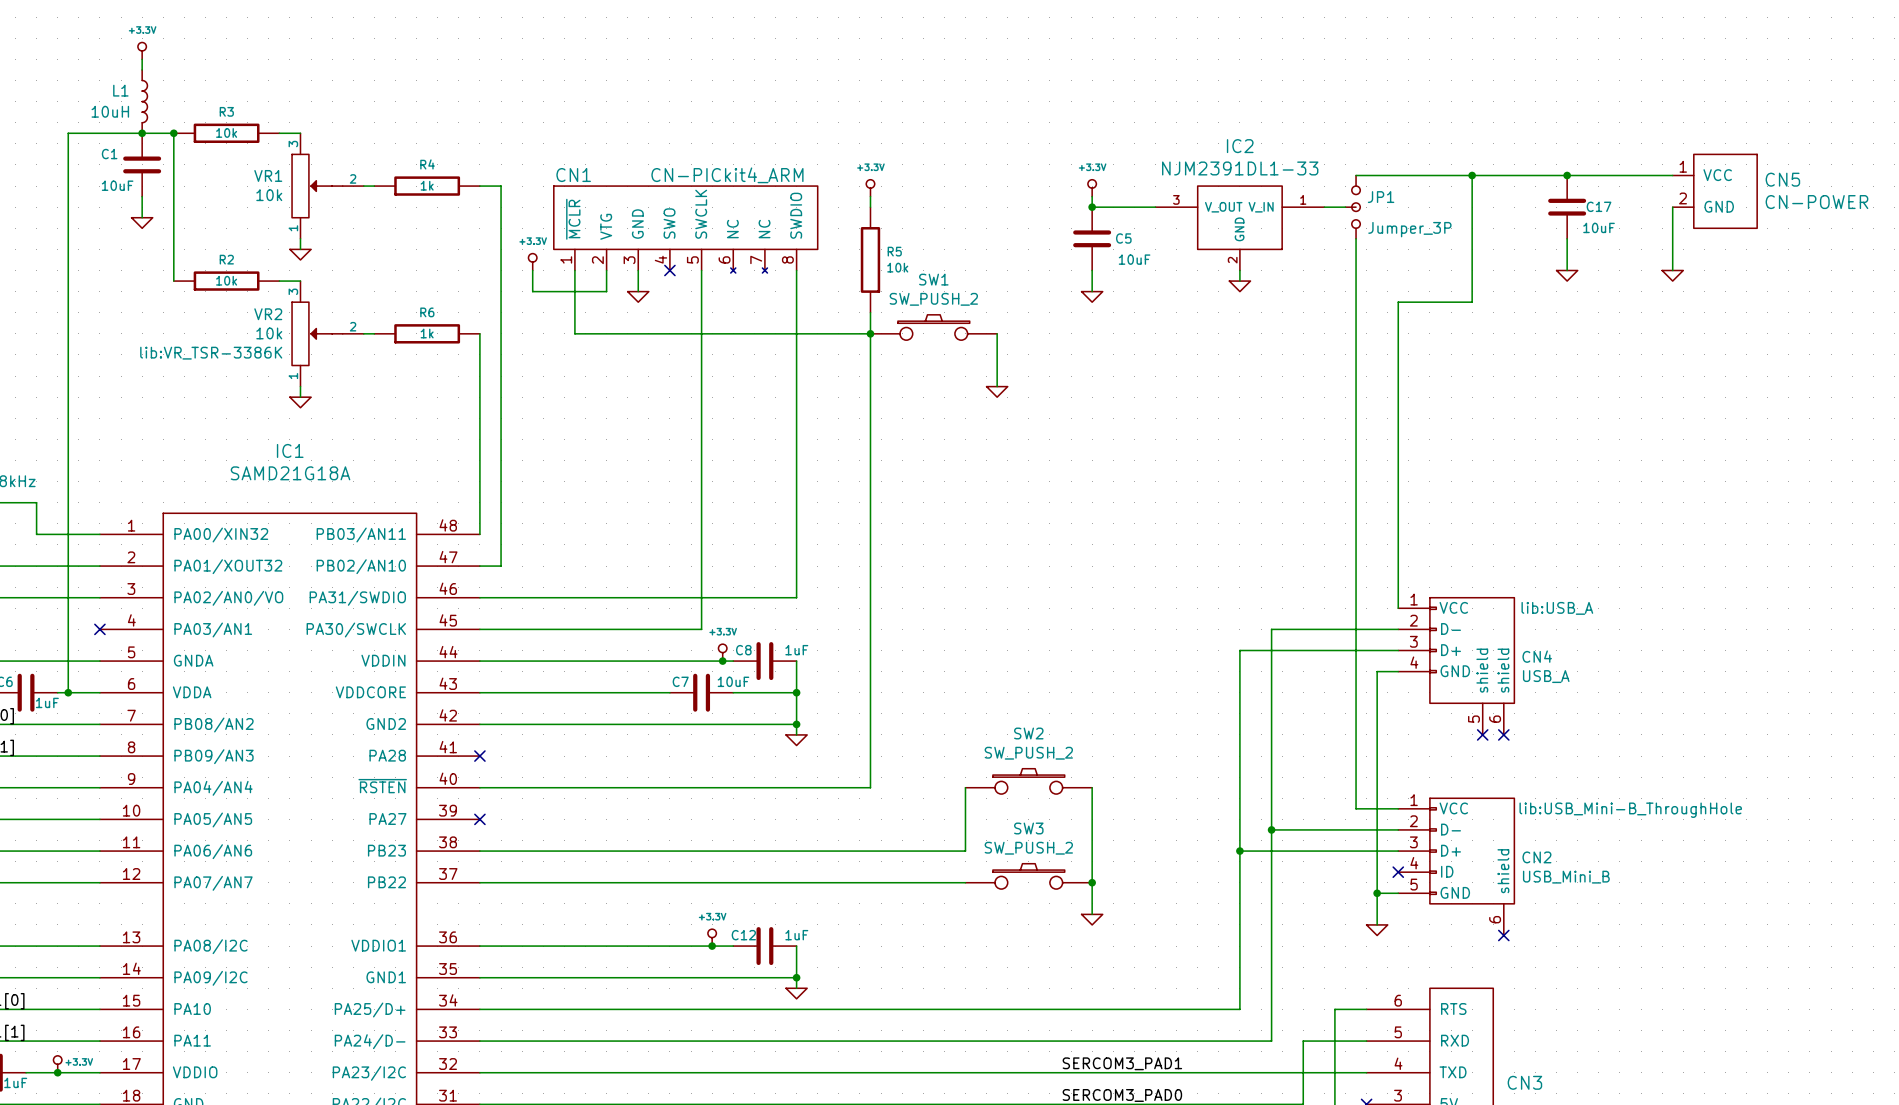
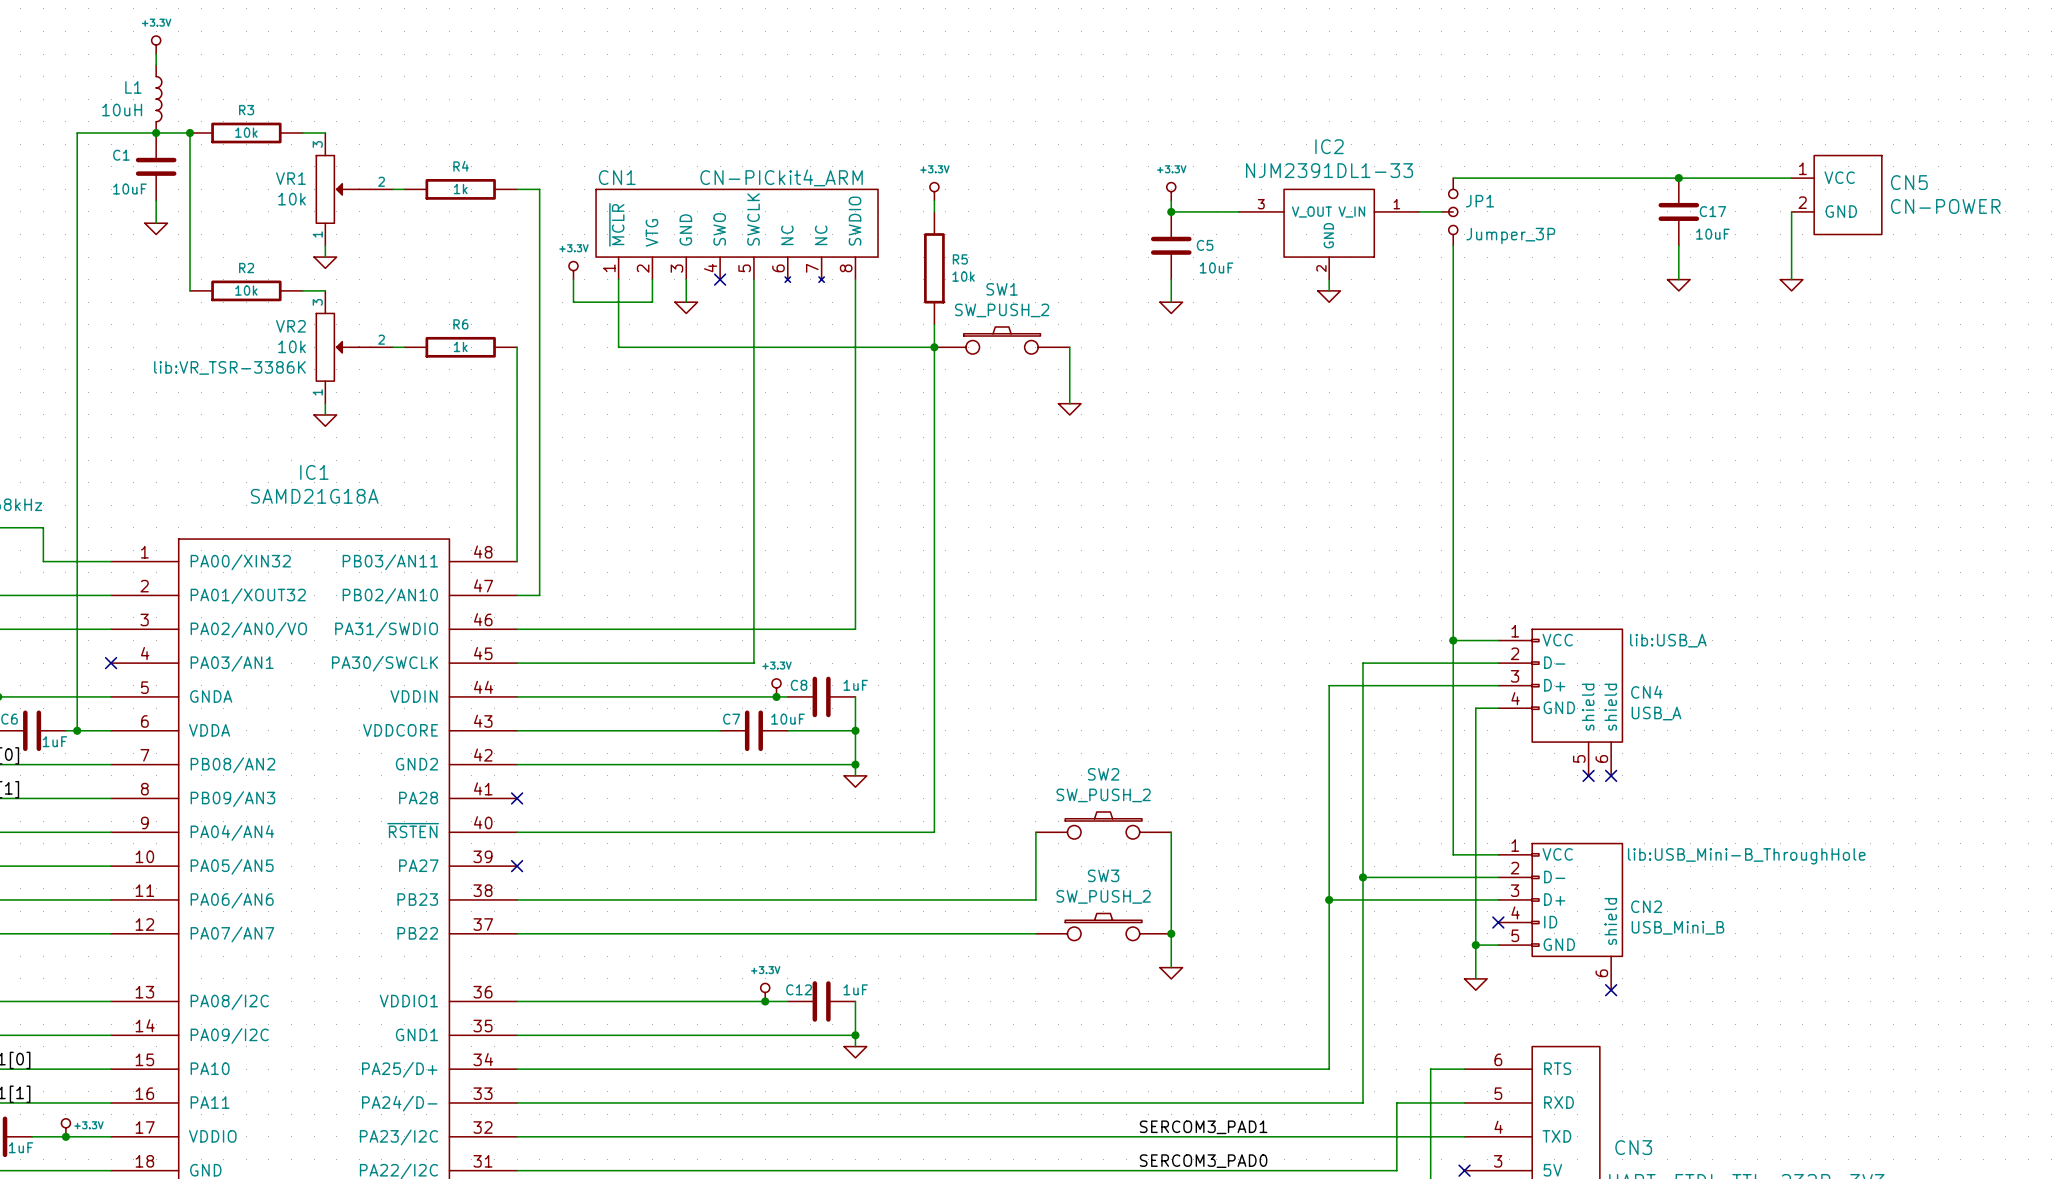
wire: (1472, 175) (1472, 302) (1398, 302) (1398, 608) -> (1453, 640) (1498, 640)
junction: (1472, 175) -> none
junction: none -> (1453, 640)

